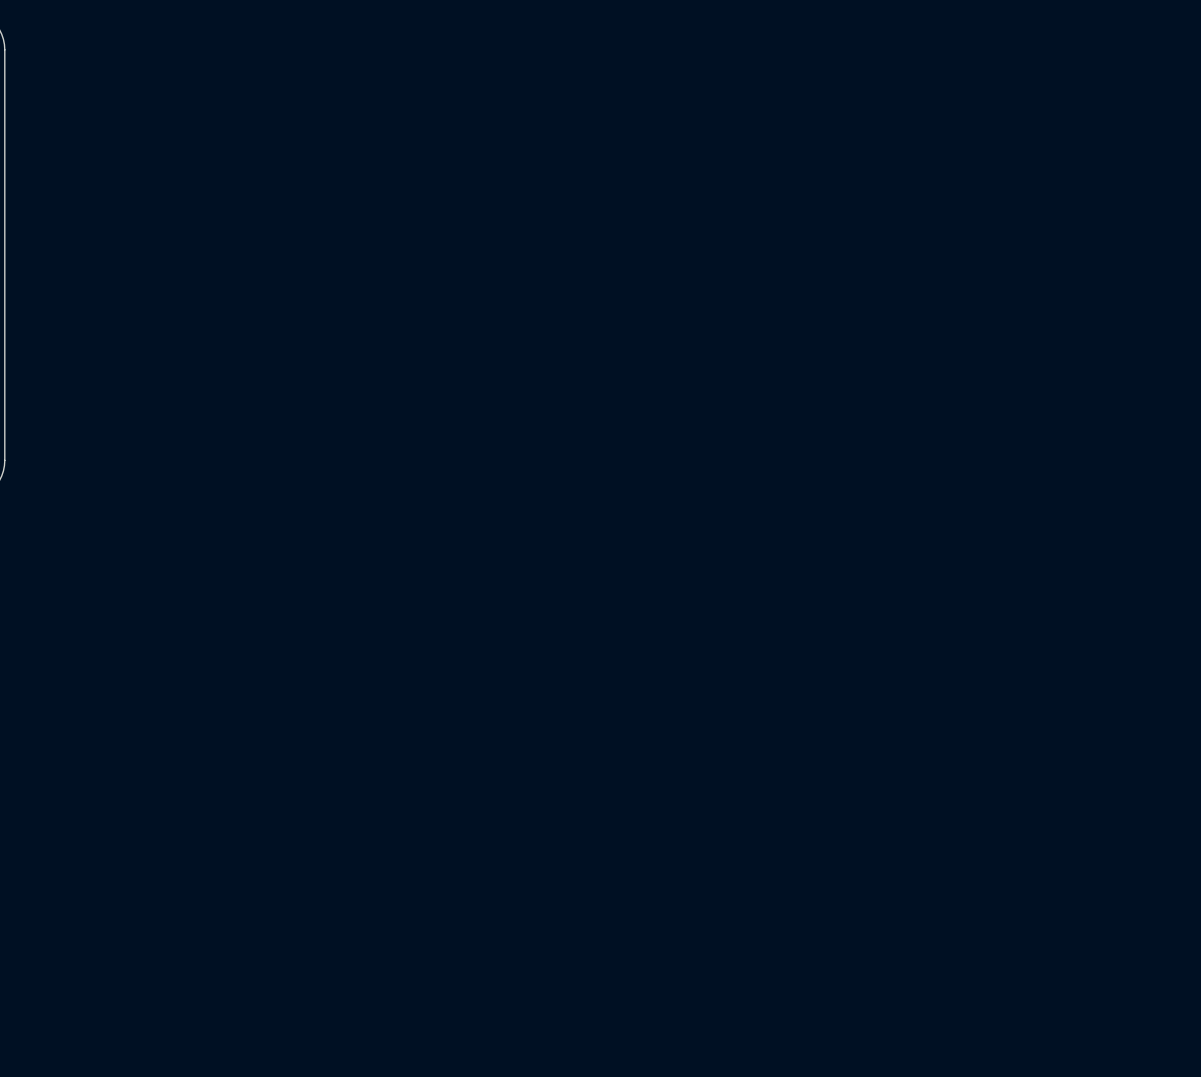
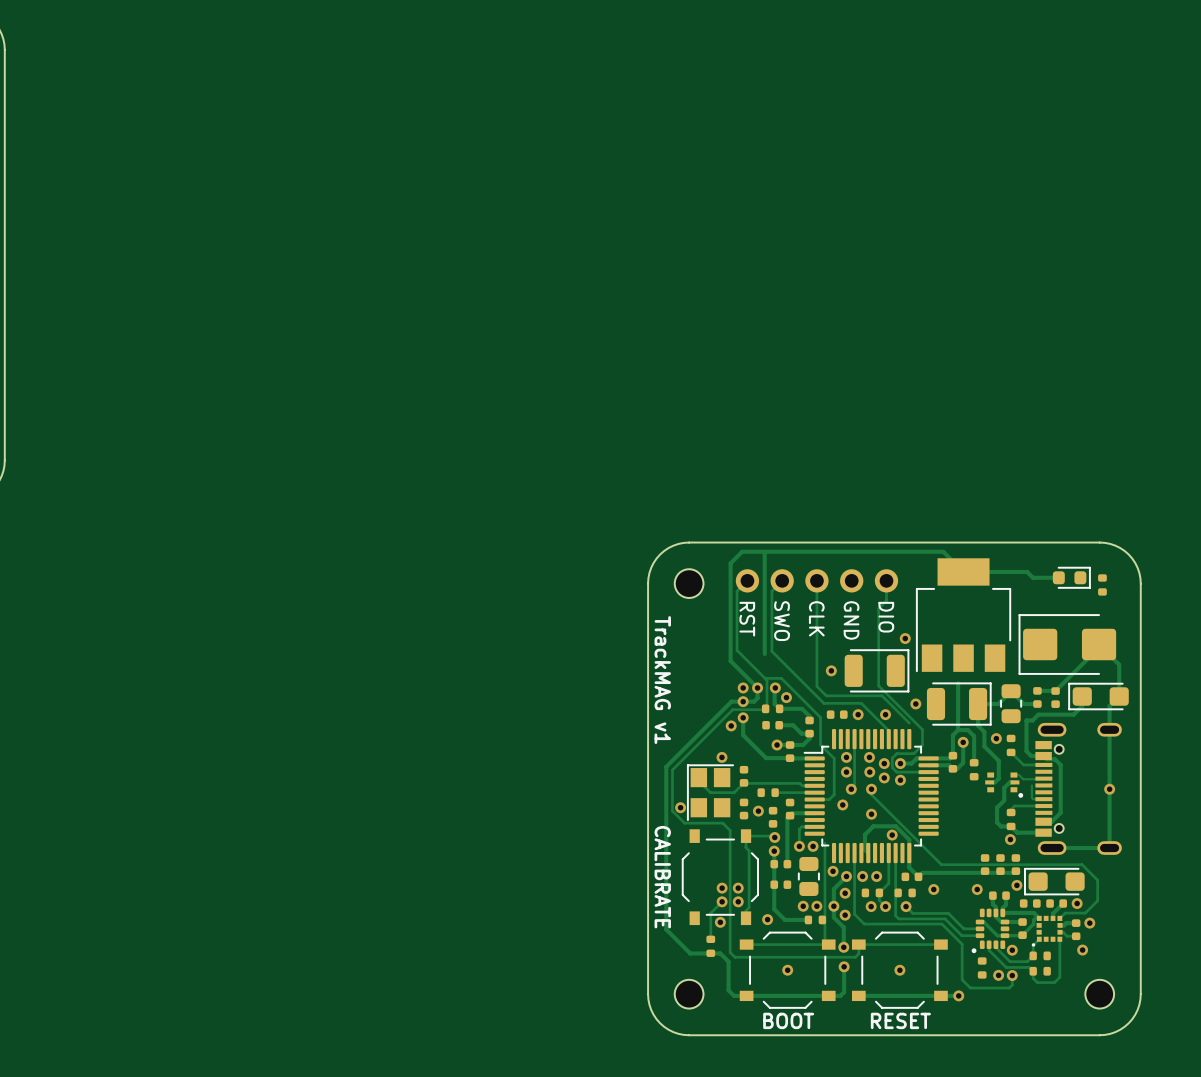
board edge: none -> (689, 542) (1099, 542) (1115, 545) (1128, 554) (1137, 567) (1140, 583) (1140, 994) (1137, 1009) (1128, 1023) (1115, 1032) (1099, 1035) (689, 1035) (673, 1032) (660, 1023) (651, 1009) (648, 994) (648, 583) (651, 567) (660, 554) (673, 545) (689, 542)
track: none -> (764, 551) (764, 654)
track: none -> (1058, 577) (1033, 577) (1027, 571) (963, 571) (943, 551) (742, 551) (730, 563) (730, 661) (757, 687)
part: none -> (1071, 577)
track: none -> (747, 580) (737, 591) (737, 650) (767, 680) (767, 707) (764, 709) (732, 709) (672, 769) (672, 811) (684, 823) (722, 823) (730, 830) (730, 952) (734, 957) (855, 957) (858, 953) (858, 944) (940, 944)
track: none -> (782, 580) (771, 591) (771, 651) (823, 703) (861, 703) (888, 730) (888, 739)
track: none -> (816, 580) (816, 686) (826, 695) (882, 695) (909, 723)
part: none -> (816, 580)
part: none -> (689, 583)
track: none -> (883, 583) (886, 580) (886, 600) (878, 608) (878, 685) (922, 729) (922, 745) (913, 753) (896, 753) (892, 758) (892, 767) (896, 772) (928, 772)
part: none -> (1102, 584)
part: none -> (963, 615)
via: none -> (905, 638)
part: none -> (1067, 644)
via: none -> (831, 670)
part: none -> (876, 670)
track: none -> (765, 678) (781, 678) (820, 717) (820, 744)
text: none -> TrackMAG v1 (662, 680)
track: none -> (958, 683) (958, 730)
via: none -> (743, 687)
track: none -> (757, 687) (757, 698) (754, 701) (731, 701) (666, 766) (666, 929) (690, 953) (720, 953) (728, 961) (728, 990) (734, 995) (746, 995)
via: none -> (757, 687)
track: none -> (775, 687) (774, 703) (779, 708) (802, 708) (809, 716) (809, 720)
via: none -> (775, 687)
track: none -> (1037, 690) (1055, 690)
track: none -> (1055, 691) (1099, 647) (1099, 644) (1119, 664) (1119, 696) (1109, 706) (1109, 848) (1052, 848)
track: none -> (1082, 696) (1082, 706) (1073, 714) (1038, 714) (1032, 720) (1026, 720) (1026, 751) (1031, 756) (1043, 756) (1046, 759) (1055, 759) (1060, 764) (1060, 812) (1051, 821) (1043, 821)
part: none -> (1098, 696)
via: none -> (786, 697)
part: none -> (1037, 697)
part: none -> (1055, 697)
via: none -> (743, 701)
via: none -> (915, 703)
part: none -> (1011, 703)
part: none -> (959, 704)
track: none -> (1037, 704) (1023, 704) (1011, 691) (998, 704) (978, 704) (978, 725) (984, 732) (984, 746) (998, 760) (998, 778) (995, 782) (989, 782)
part: none -> (772, 708)
part: none -> (837, 714)
via: none -> (858, 714)
via: none -> (885, 714)
track: none -> (743, 717) (743, 735) (766, 758) (814, 758)
via: none -> (743, 717)
via: none -> (731, 725)
part: none -> (772, 725)
track: none -> (779, 725) (793, 725) (801, 733) (809, 733) (809, 738) (803, 745) (777, 745)
part: none -> (809, 727)
track: none -> (958, 730) (968, 730) (974, 736) (974, 762)
track: none -> (958, 730) (952, 735) (952, 755) (950, 758) (916, 758) (911, 763) (900, 763)
via: none -> (996, 738)
track: none -> (854, 739) (854, 785) (851, 789)
track: none -> (963, 742) (963, 762) (957, 768) (952, 768) (949, 765) (928, 765)
via: none -> (963, 742)
track: none -> (820, 744) (834, 758) (834, 794) (829, 799) (814, 799)
via: none -> (777, 745)
part: none -> (1011, 745)
part: none -> (790, 751)
track: none -> (1011, 752) (1023, 764) (1043, 764)
via: none -> (721, 757)
via: none -> (846, 757)
via: none -> (869, 757)
part: none -> (952, 762)
via: none -> (884, 763)
via: none -> (900, 763)
part: none -> (974, 769)
via: none -> (846, 772)
via: none -> (869, 772)
track: none -> (1013, 775) (1019, 775) (1023, 779) (1039, 779)
part: none -> (744, 776)
track: none -> (698, 777) (698, 781) (710, 792) (734, 792) (744, 783)
via: none -> (884, 777)
via: none -> (900, 780)
track: none -> (1014, 782) (1009, 782) (1004, 787) (1004, 800) (997, 807) (997, 822) (1001, 826) (1011, 826) (1017, 832) (1043, 832)
track: none -> (743, 783) (799, 783) (802, 785) (814, 785)
part: none -> (1004, 785)
track: none -> (1031, 785) (1031, 797) (1043, 799)
part: none -> (1078, 788)
via: none -> (851, 789)
track: none -> (871, 789) (871, 794) (941, 864) (1082, 864) (1097, 880) (1097, 900) (1085, 913) (1065, 913) (1059, 918)
via: none -> (871, 789)
via: none -> (1109, 789)
part: none -> (710, 792)
part: none -> (768, 792)
track: none -> (775, 792) (814, 792)
part: none -> (871, 796)
via: none -> (842, 804)
track: none -> (1043, 806) (1014, 806) (1011, 812)
via: none -> (680, 807)
part: none -> (744, 809)
part: none -> (790, 809)
via: none -> (758, 811)
track: none -> (814, 813) (792, 813) (787, 818) (787, 864)
via: none -> (871, 814)
part: none -> (773, 817)
part: none -> (1011, 819)
track: none -> (814, 826) (801, 826) (799, 829) (799, 846)
via: none -> (892, 835)
track: none -> (773, 836) (746, 836) (746, 847)
via: none -> (774, 837)
via: none -> (1010, 839)
track: none -> (824, 842) (824, 940)
via: none -> (799, 846)
via: none -> (813, 846)
track: none -> (745, 847) (749, 850) (749, 907) (746, 910) (746, 918)
track: none -> (774, 851) (774, 909) (784, 919) (808, 919)
via: none -> (774, 851)
track: none -> (854, 853) (854, 914) (864, 924) (941, 924) (962, 944) (962, 979) (970, 988) (1009, 988) (1012, 985) (1012, 975)
track: none -> (868, 853) (865, 849) (865, 834) (873, 826) (895, 826) (909, 839) (909, 867) (918, 876) (922, 872) (1015, 872)
track: none -> (888, 853) (888, 883) (879, 892) (879, 900) (885, 906)
track: none -> (895, 853) (895, 915) (898, 918) (945, 918) (961, 935) (980, 935)
part: none -> (780, 864)
part: none -> (985, 864)
part: none -> (1000, 864)
part: none -> (1015, 864)
via: none -> (833, 871)
part: none -> (808, 876)
track: none -> (846, 876) (833, 889) (833, 917) (843, 927) (843, 947)
via: none -> (846, 876)
via: none -> (862, 876)
via: none -> (876, 876)
part: none -> (911, 876)
part: none -> (720, 877)
part: none -> (1054, 881)
part: none -> (780, 884)
via: none -> (1016, 885)
via: none -> (722, 888)
via: none -> (738, 888)
via: none -> (933, 889)
via: none -> (977, 889)
part: none -> (872, 892)
part: none -> (905, 892)
via: none -> (845, 893)
track: none -> (992, 895) (995, 916) (1001, 921) (1022, 921)
part: none -> (999, 895)
track: none -> (1006, 895) (1006, 904) (1002, 908) (1002, 912) (1033, 912) (1039, 918) (1033, 920) (1033, 924) (1022, 935) (997, 935) (983, 921) (980, 921)
track: none -> (722, 901) (710, 913) (710, 939)
via: none -> (722, 901)
via: none -> (738, 901)
part: none -> (1030, 903)
part: none -> (1056, 903)
track: none -> (1063, 903) (1053, 913) (1053, 918)
via: none -> (1077, 903)
via: none -> (803, 906)
via: none -> (816, 906)
via: none -> (833, 906)
via: none -> (871, 906)
via: none -> (885, 906)
track: none -> (906, 906) (912, 913) (948, 913) (963, 928) (980, 928)
via: none -> (906, 906)
via: none -> (845, 915)
via: none -> (767, 919)
part: none -> (815, 919)
via: none -> (720, 922)
via: none -> (1089, 923)
track: none -> (1060, 925) (1076, 923) (1073, 925)
part: none -> (1022, 928)
part: none -> (1076, 929)
part: none -> (990, 930)
part: none -> (1047, 931)
track: none -> (1060, 932) (1063, 932) (1067, 936) (1076, 936)
track: none -> (1039, 939) (1033, 945) (1033, 955) (1027, 961) (1010, 961) (995, 947) (995, 944)
track: none -> (1059, 939) (1059, 977) (1054, 982) (1037, 982) (1033, 978) (1033, 971) (1029, 967) (1006, 967) (989, 950) (989, 944)
track: none -> (749, 944) (831, 944)
part: none -> (710, 946)
via: none -> (843, 947)
via: none -> (1012, 950)
via: none -> (1082, 950)
part: none -> (1040, 955)
track: none -> (844, 966) (844, 992) (840, 995) (749, 995)
via: none -> (844, 966)
part: none -> (982, 967)
part: none -> (787, 970)
via: none -> (787, 970)
part: none -> (899, 970)
via: none -> (899, 970)
part: none -> (1040, 971)
via: none -> (998, 975)
via: none -> (1012, 975)
part: none -> (689, 994)
part: none -> (1099, 994)
track: none -> (858, 995) (958, 995)
via: none -> (958, 995)

